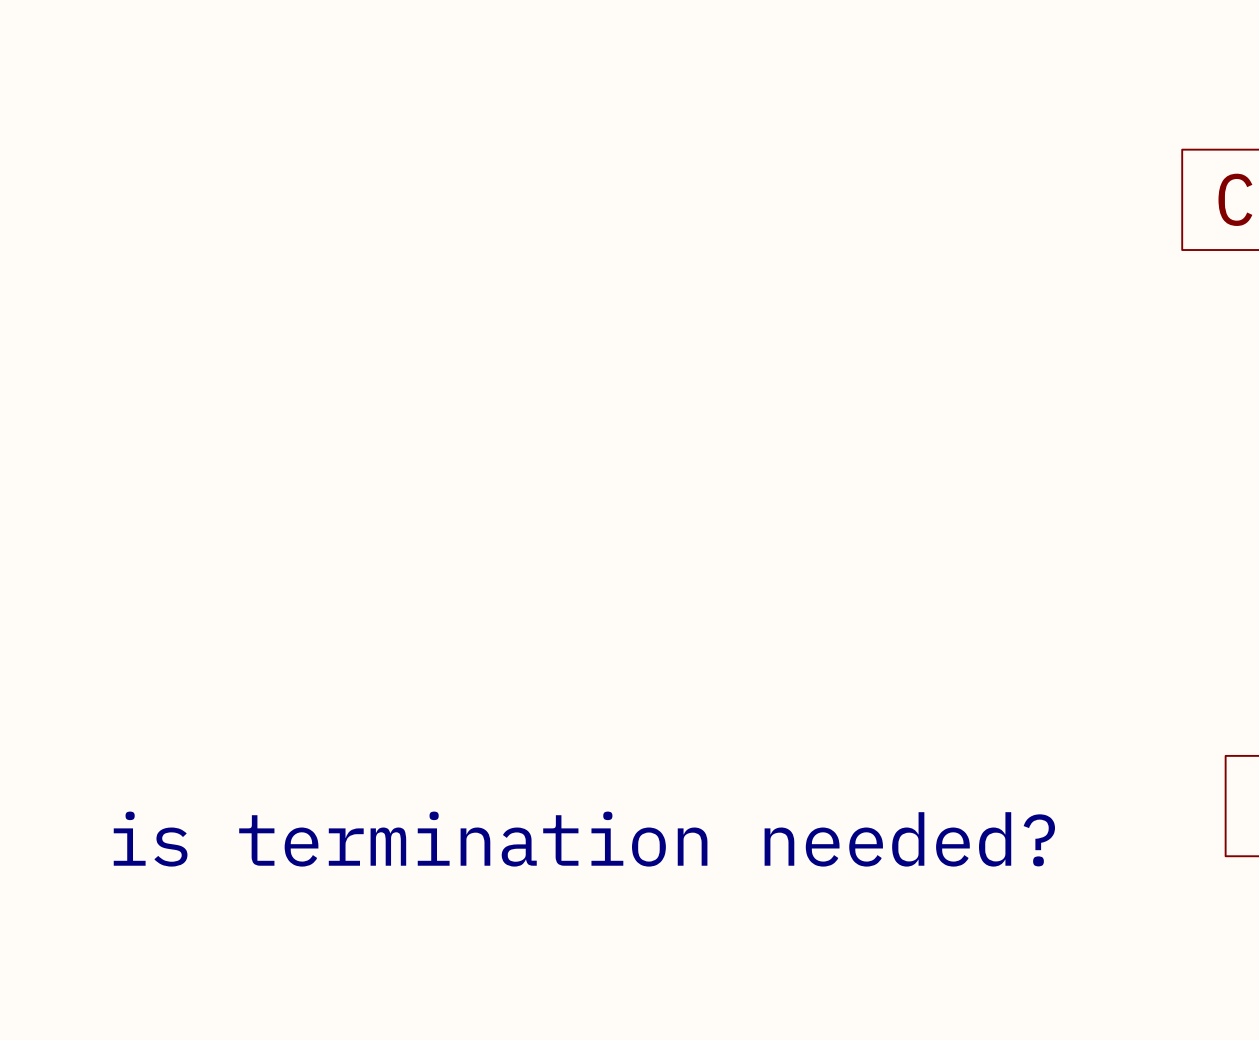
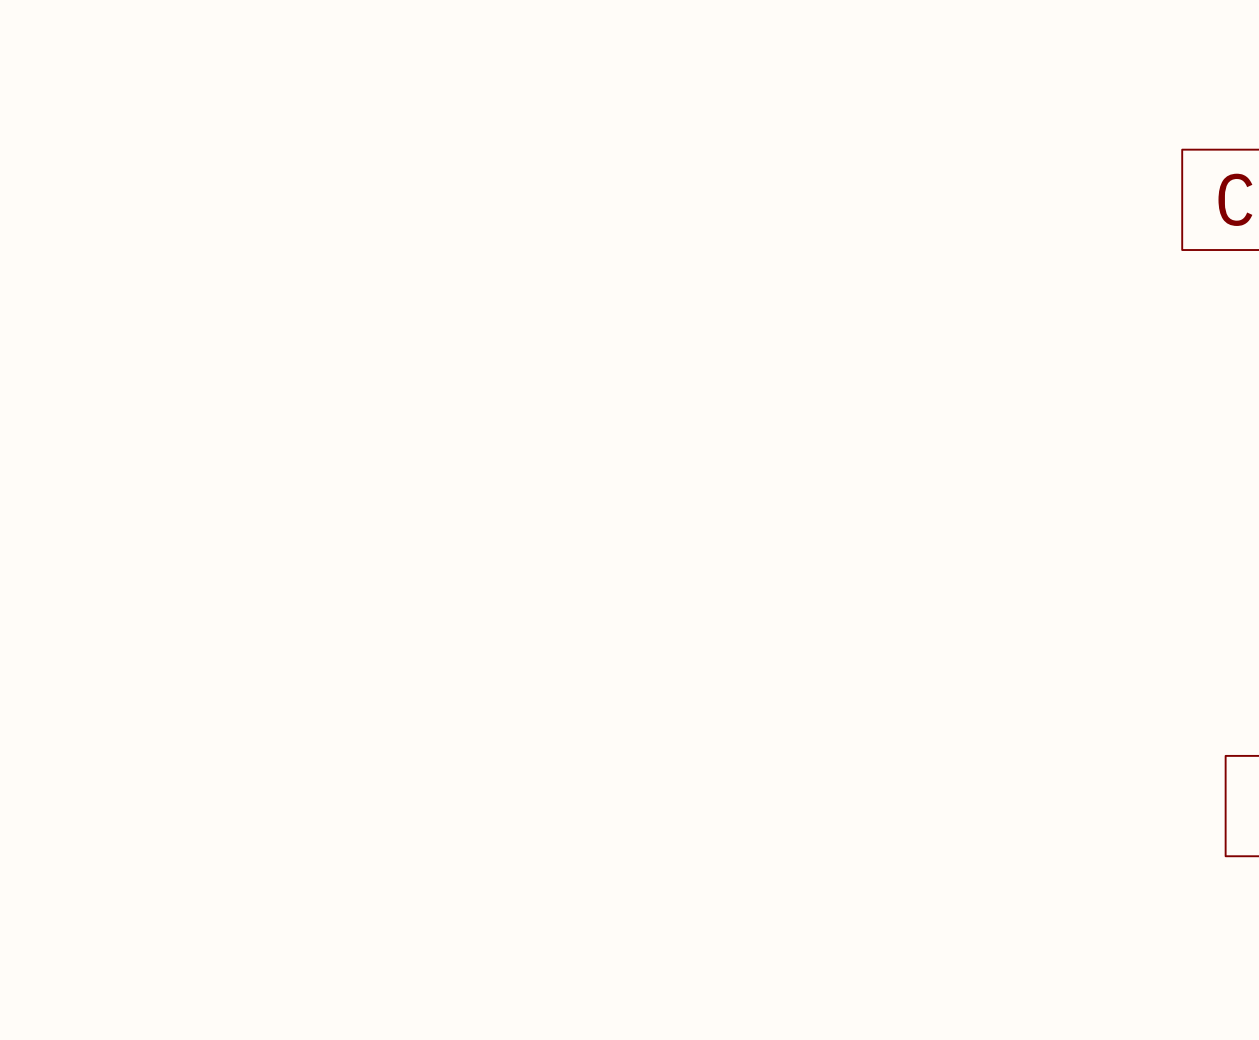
text: is termination needed? (584, 839) -> none

